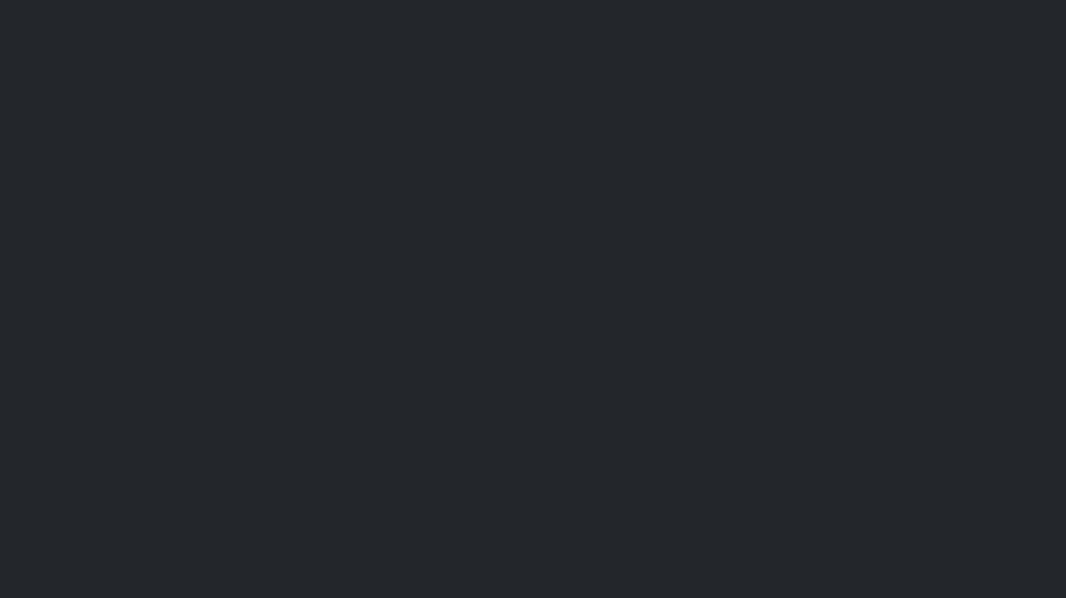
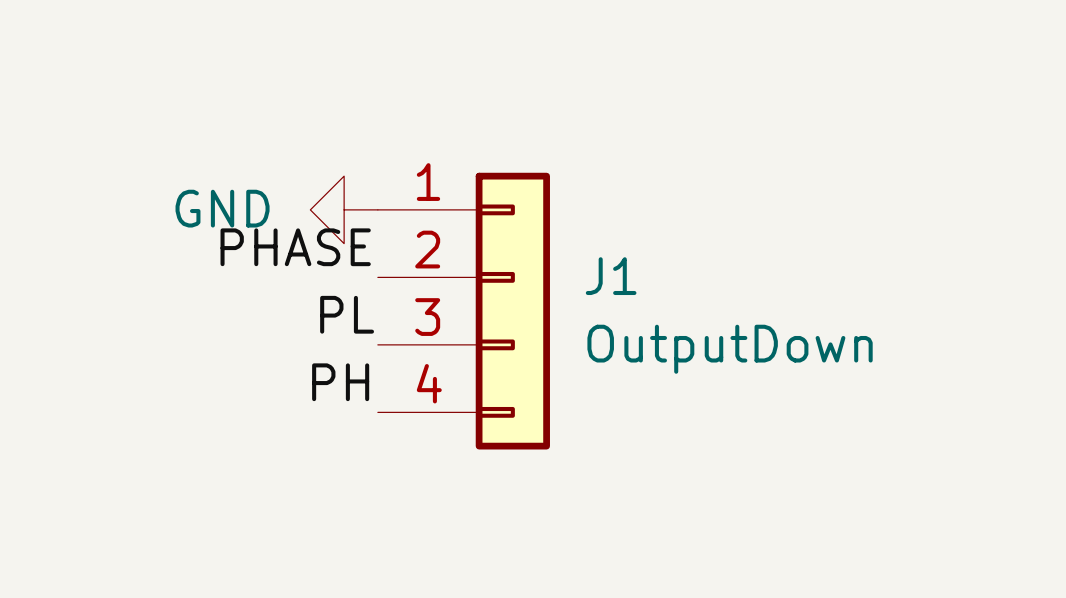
power symbol: none -> GND (344, 209)
label: none -> PHASE (295, 247)
J1: none -> OutputDown (463, 311)
label: none -> PL (347, 314)
label: none -> PH (340, 382)

